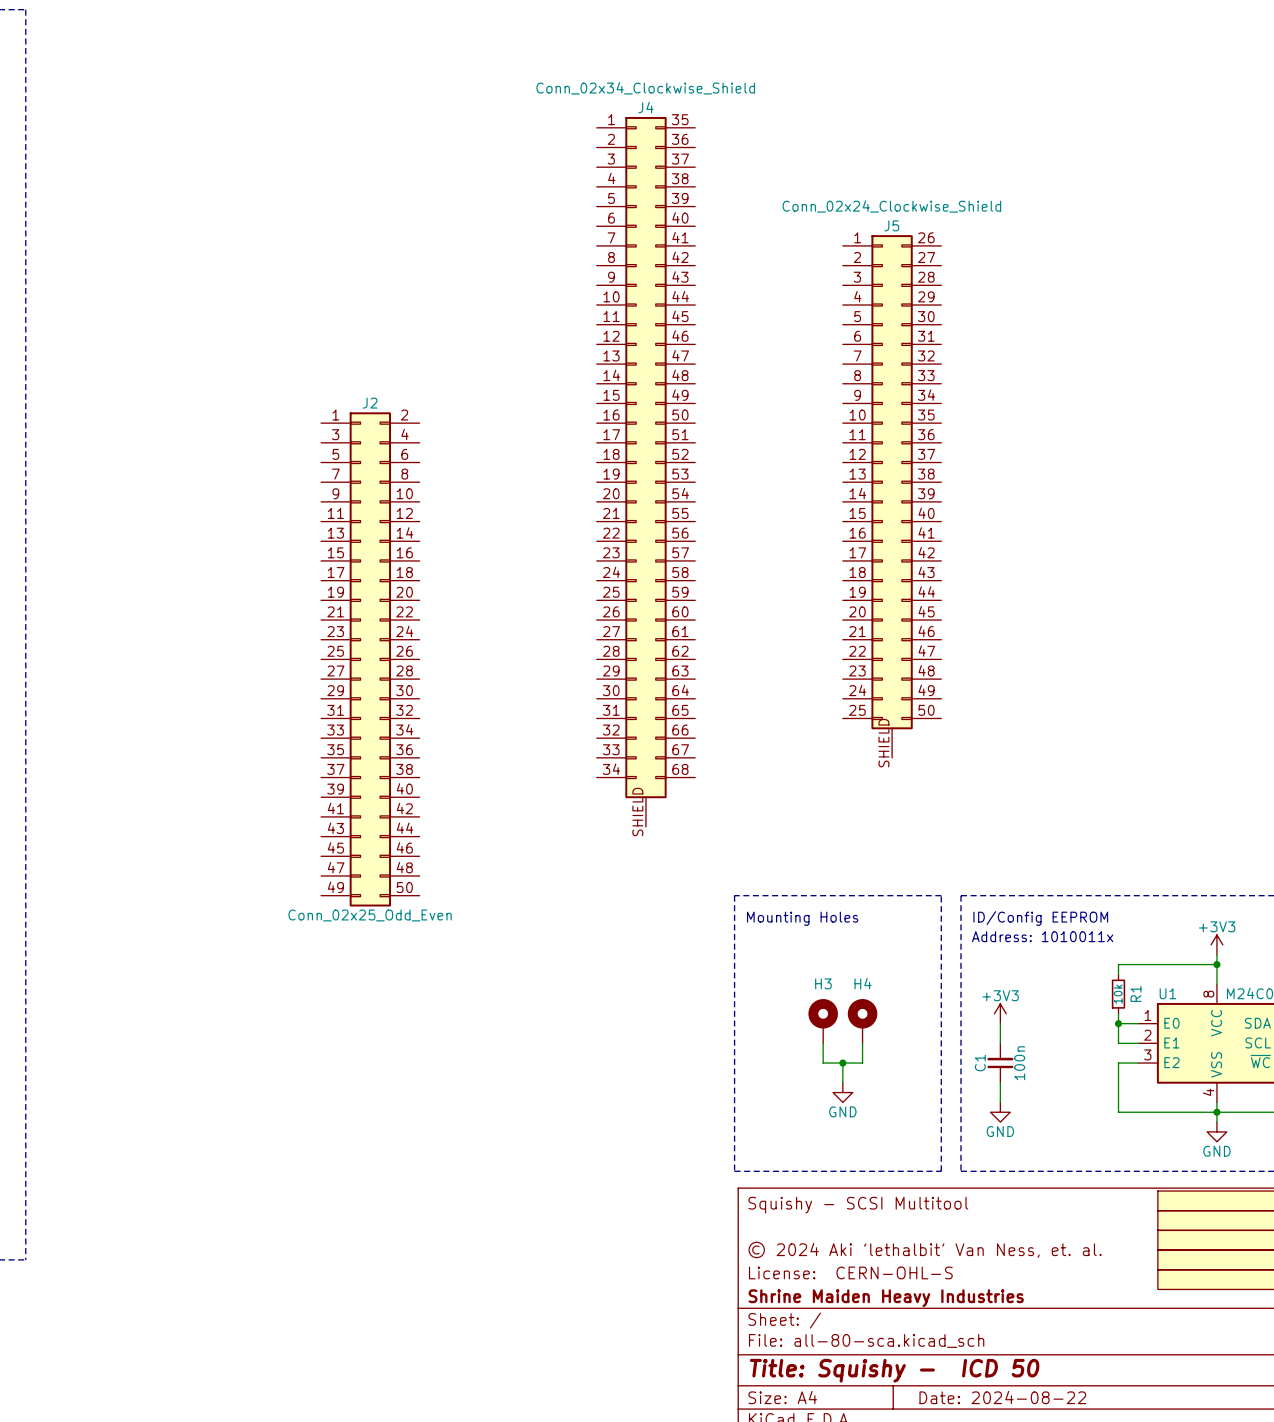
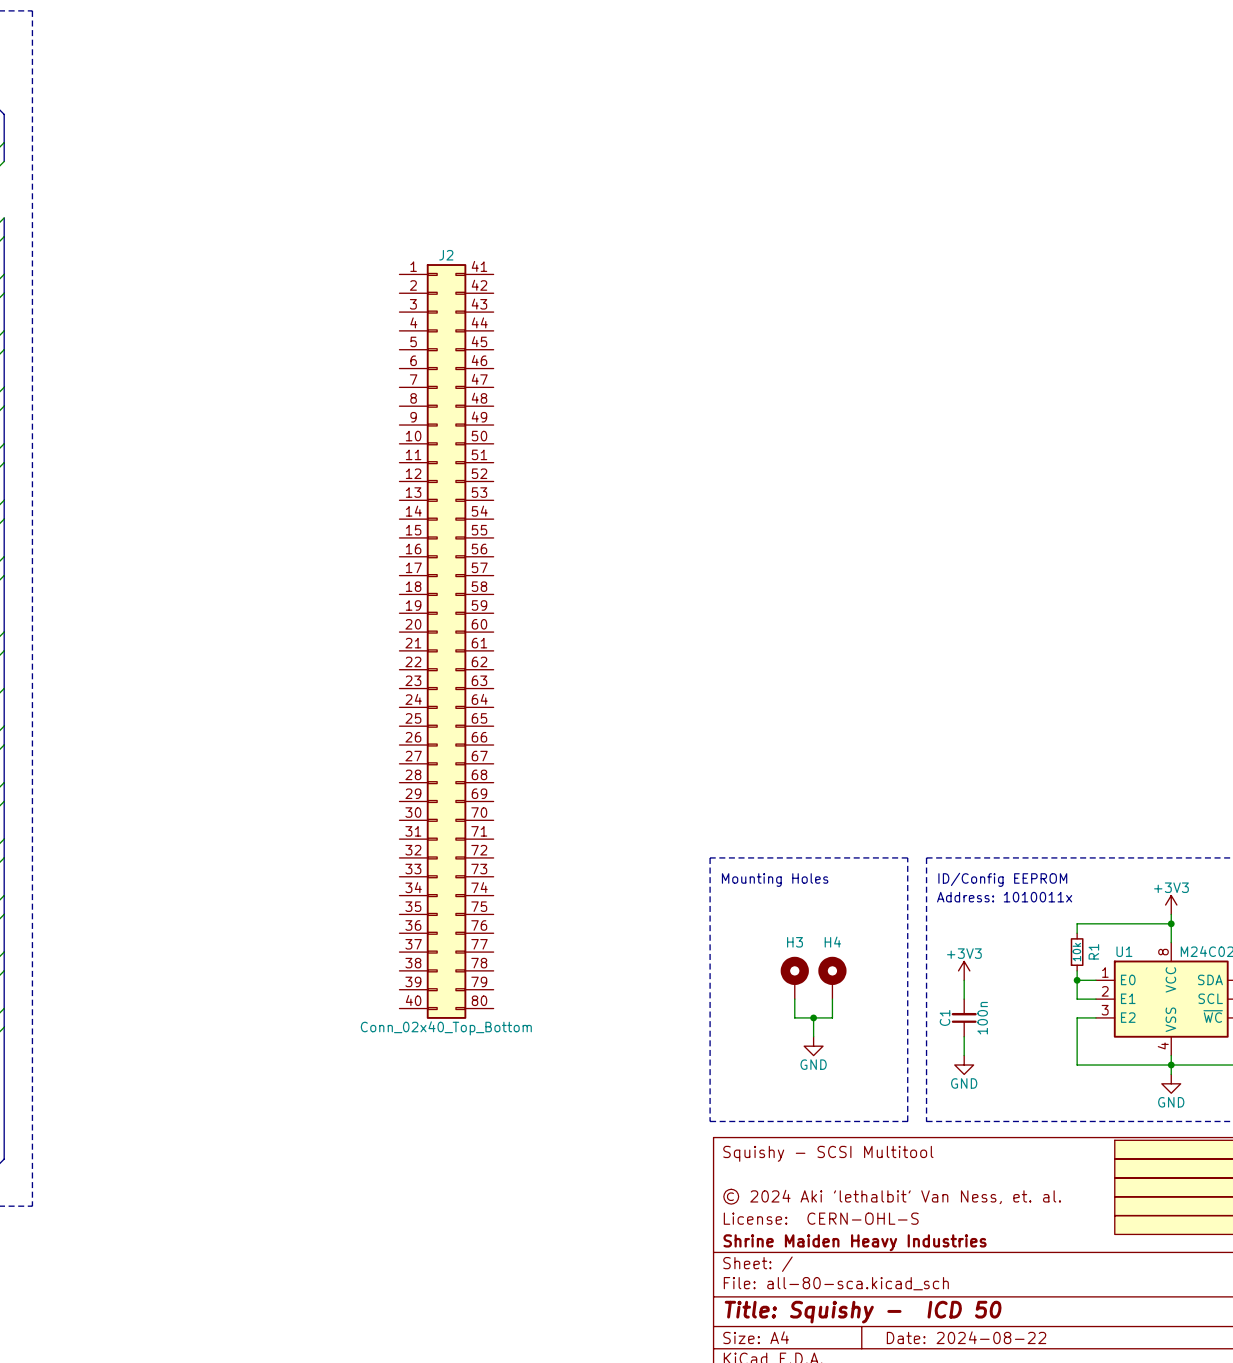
J2 name position: J2 (370, 403) -> J2 (446, 255)
J2 symbol: [321, 412, 420, 907] -> [399, 264, 494, 1019]
J4: Conn_02x34_Clockwise_Shield (645, 471) -> none
J5: Conn_02x24_Clockwise_Shield (892, 496) -> none
J2 value: Conn_02x25_Odd_Even (370, 915) -> Conn_02x40_Top_Bottom (446, 1028)

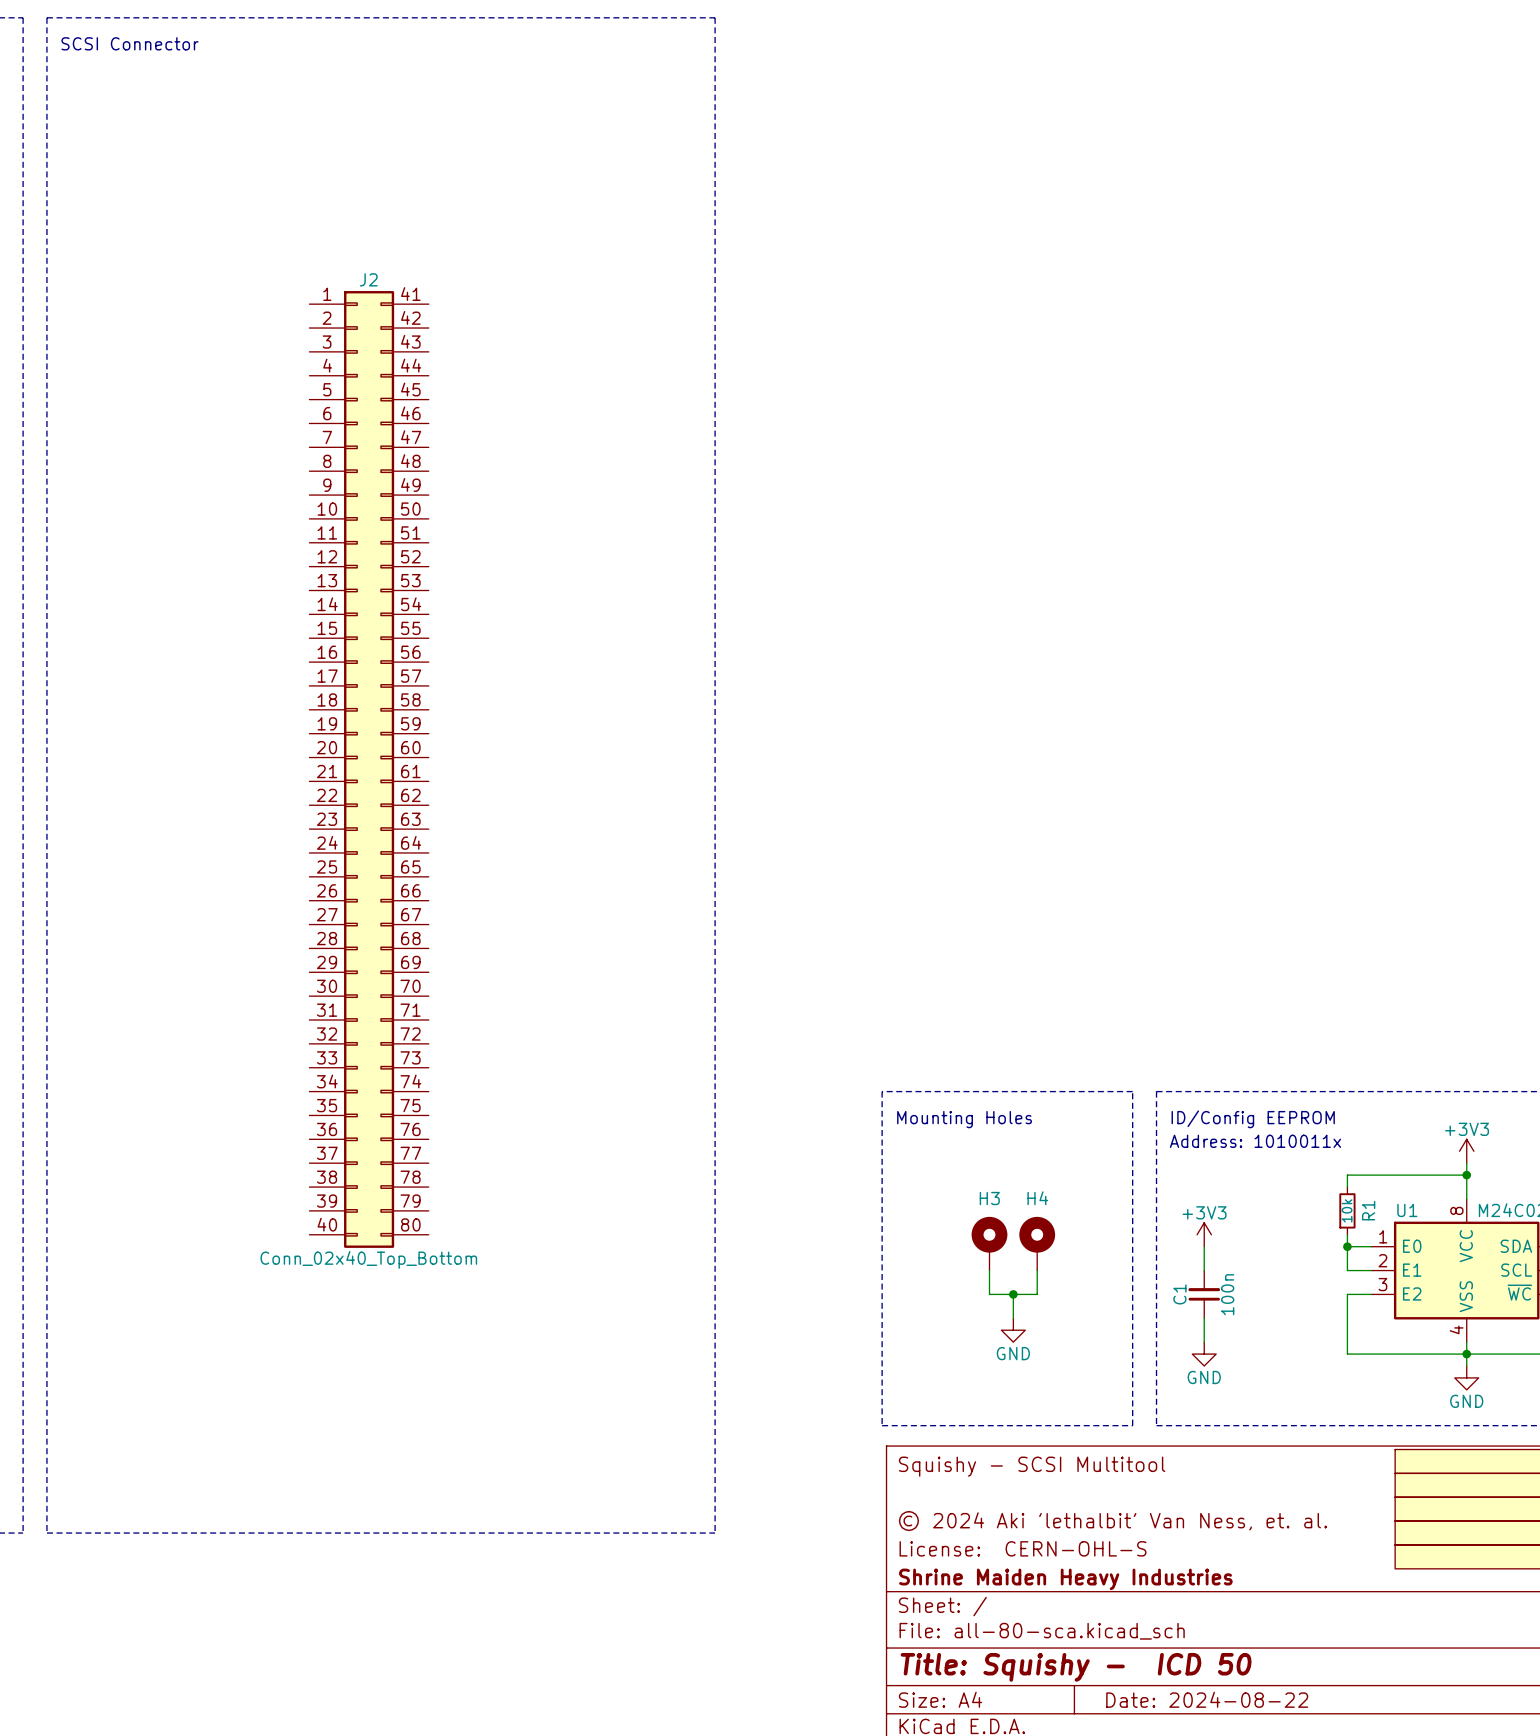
line: none -> (46, 17) (46, 1533) (715, 1533) (715, 17) (46, 17)
text: none -> SCSI Connector (129, 43)
J2 position: (446, 641) -> (369, 769)

